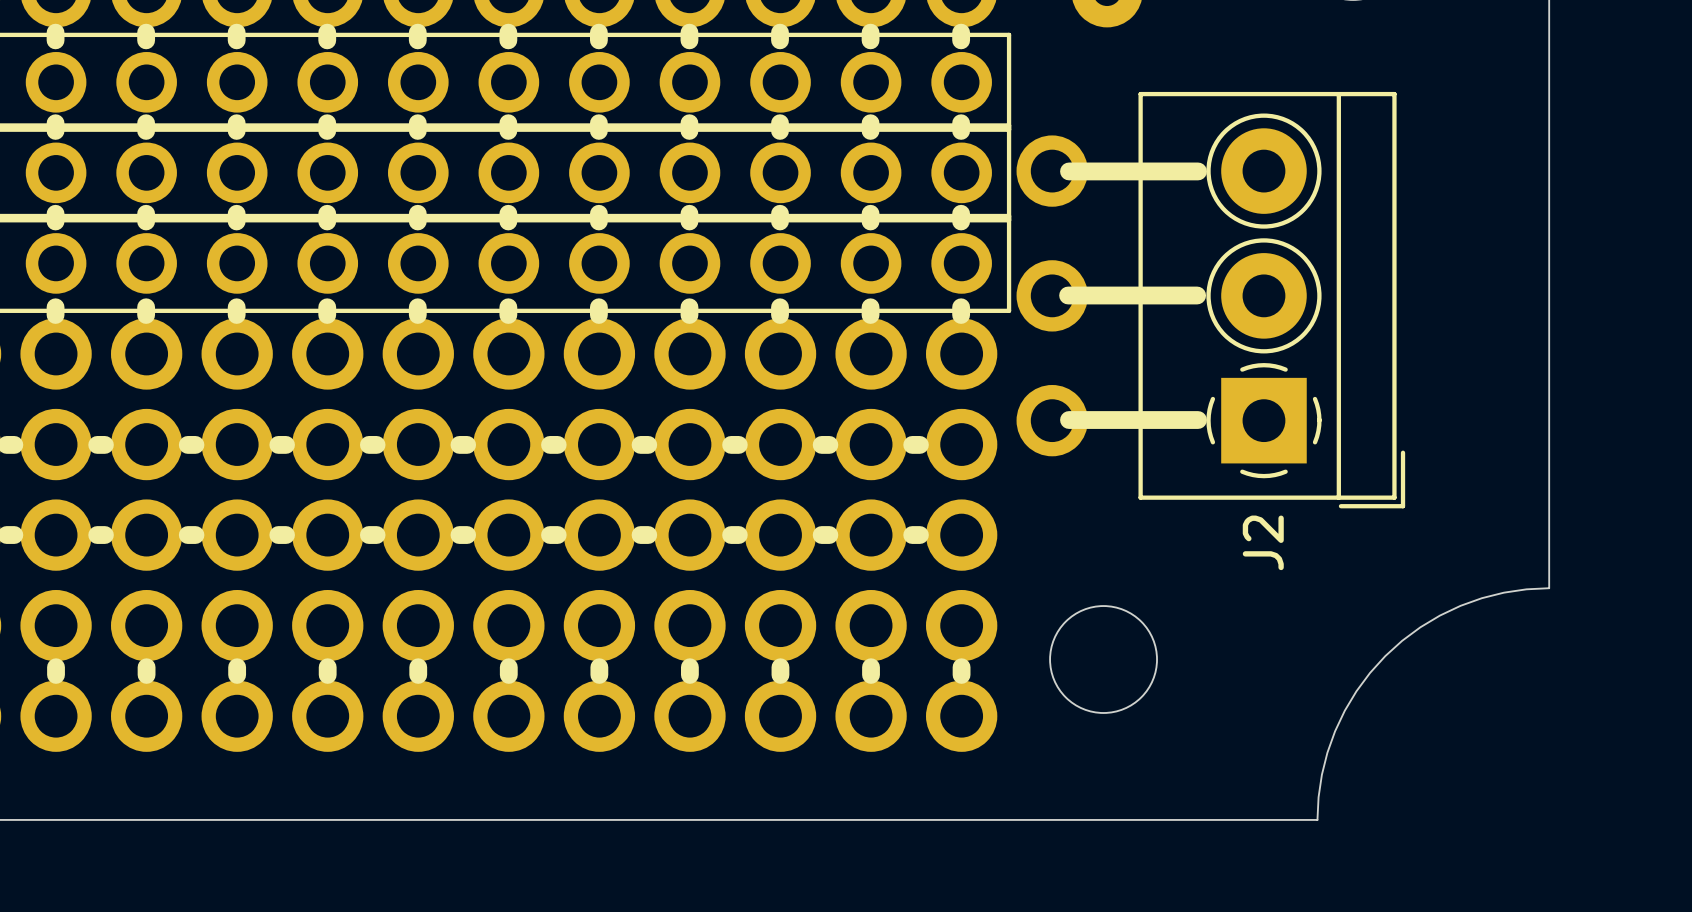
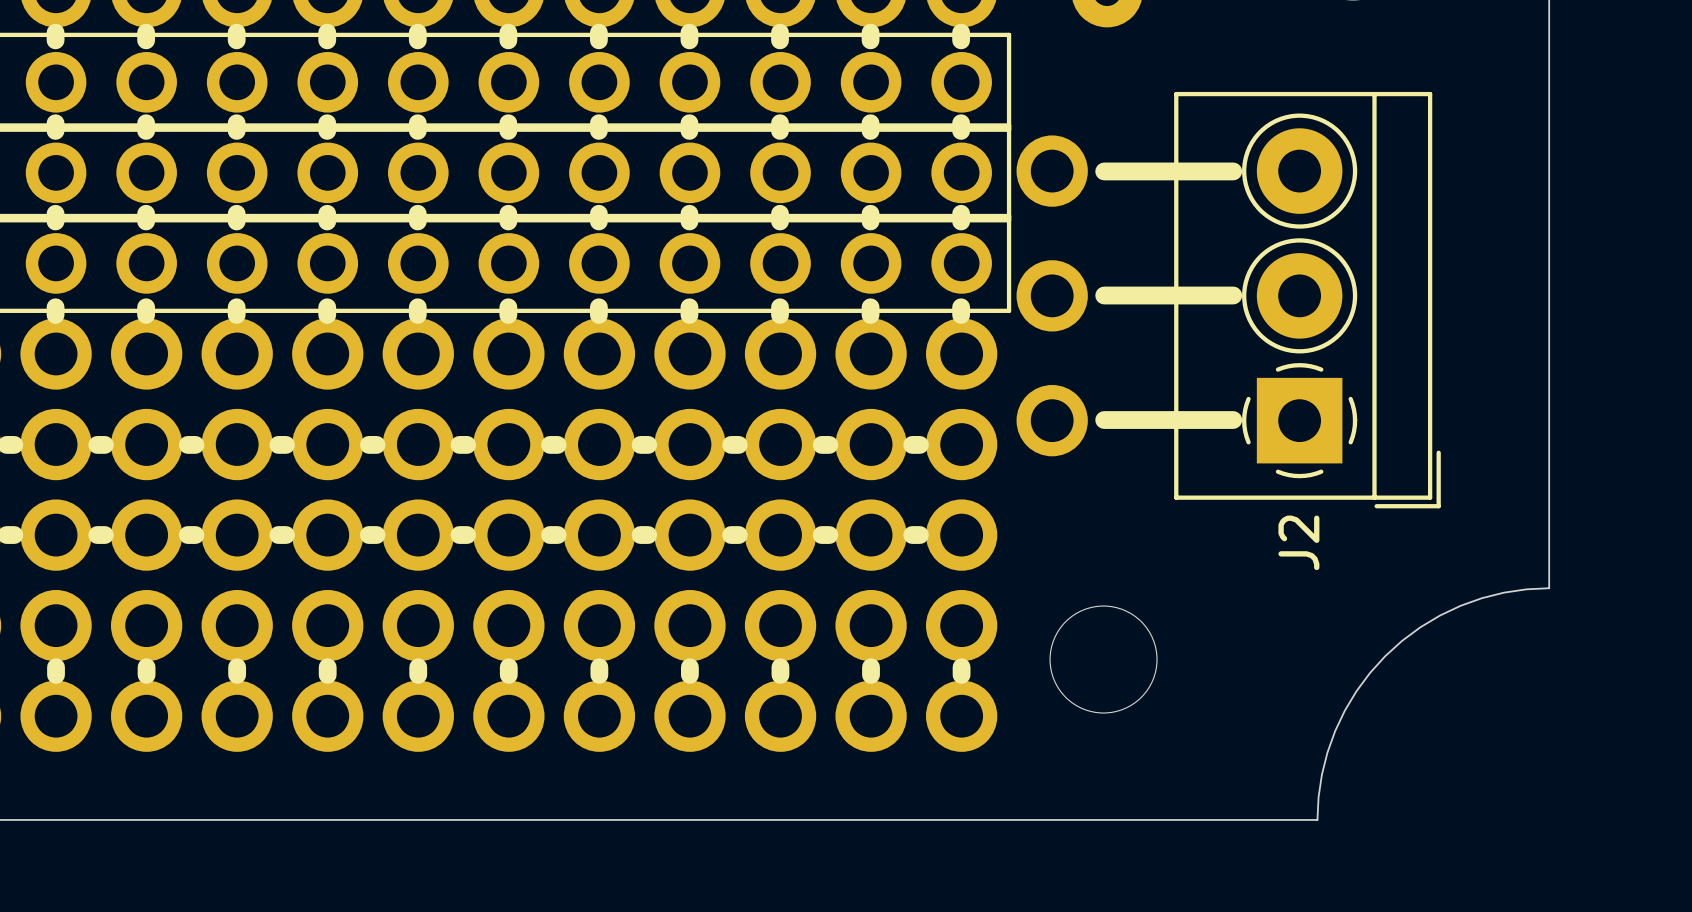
line: (1069, 171) (1104, 171) -> (1198, 171) (1233, 171)
line: (1068, 295) (1104, 295) -> (1197, 295) (1233, 295)
J2 position: (1271, 300) -> (1307, 300)
line: (1069, 420) (1104, 420) -> (1198, 420) (1233, 420)

